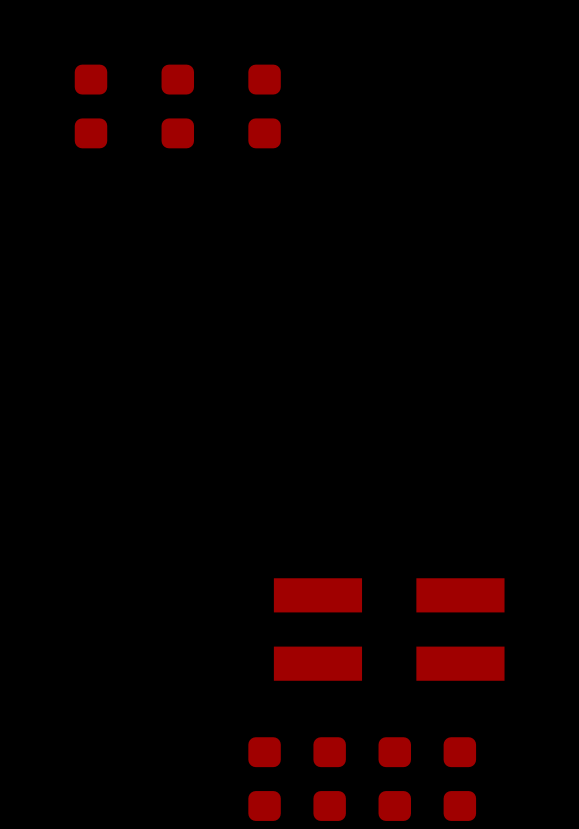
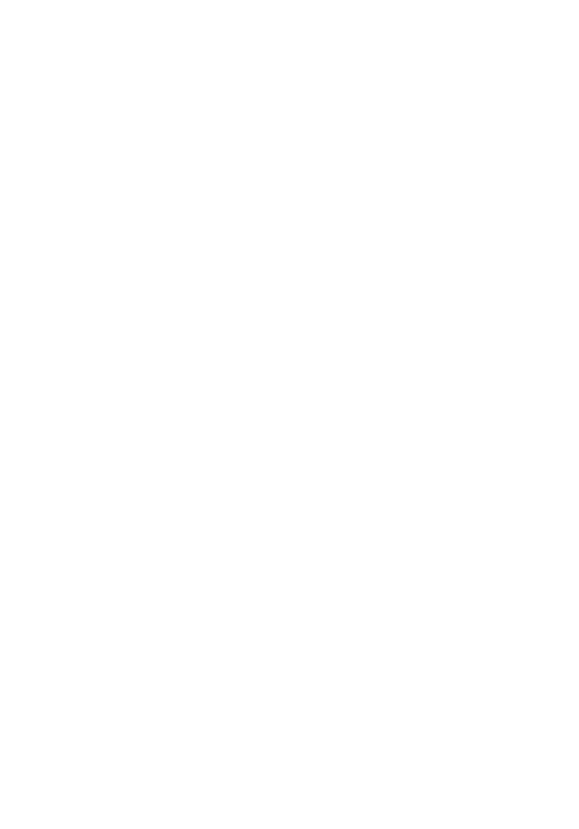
part: (90, 106) -> none
part: (177, 106) -> none
part: (264, 106) -> none
part: (389, 629) -> none
part: (264, 779) -> none
part: (329, 779) -> none
part: (394, 779) -> none
part: (459, 779) -> none

